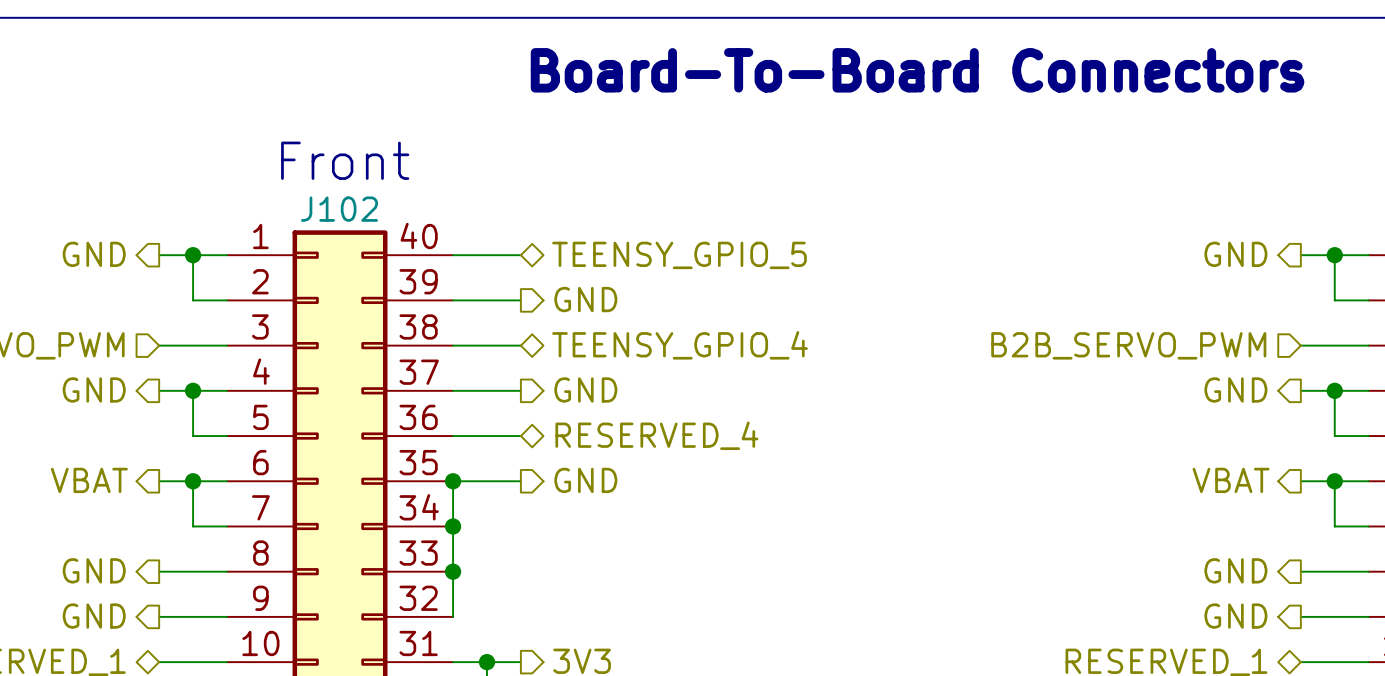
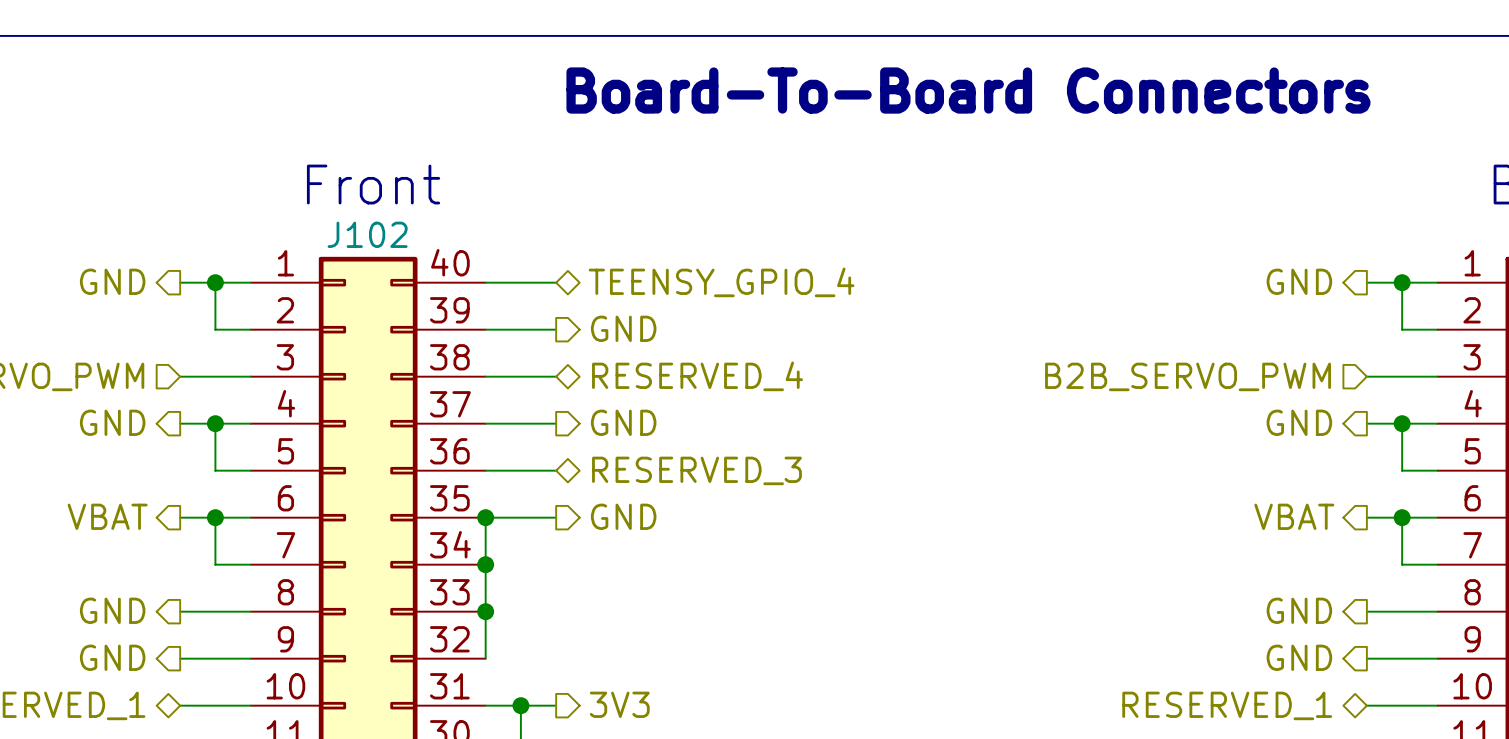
hierarchical label: TEENSY_GPIO_5 (679, 255) -> TEENSY_GPIO_4 (721, 282)
hierarchical label: TEENSY_GPIO_4 (680, 345) -> RESERVED_4 (697, 376)
hierarchical label: RESERVED_4 (656, 435) -> RESERVED_3 (696, 470)

